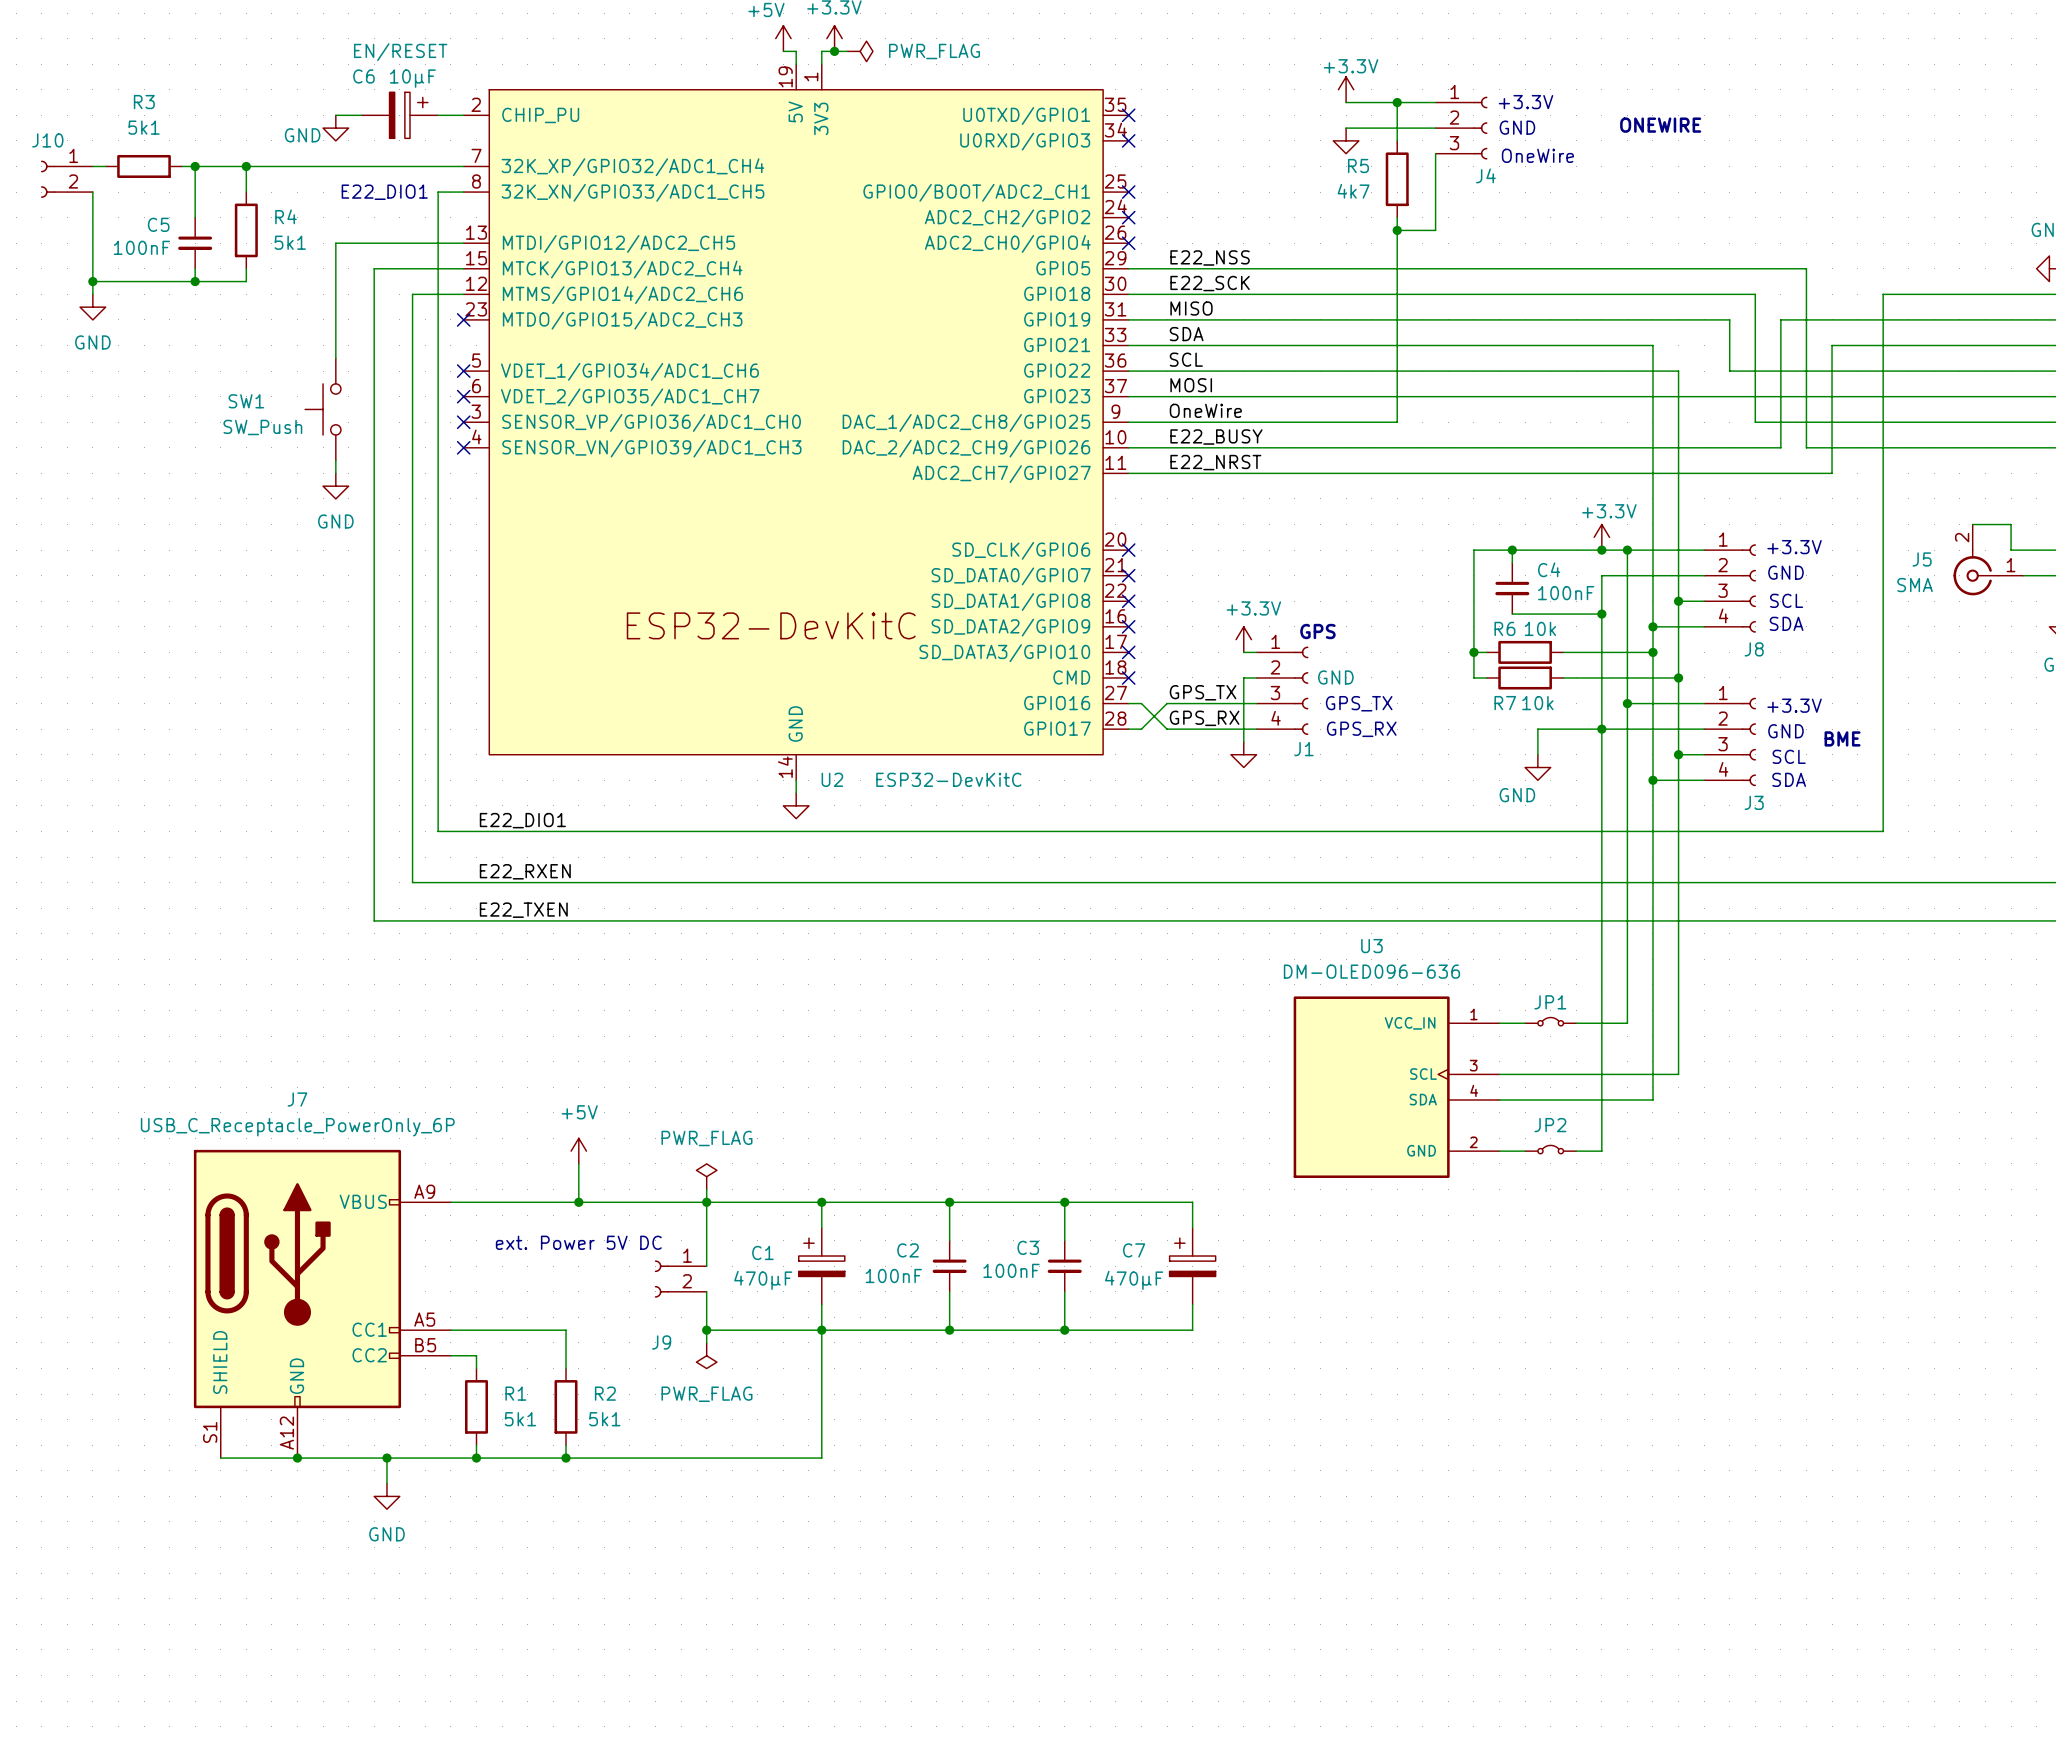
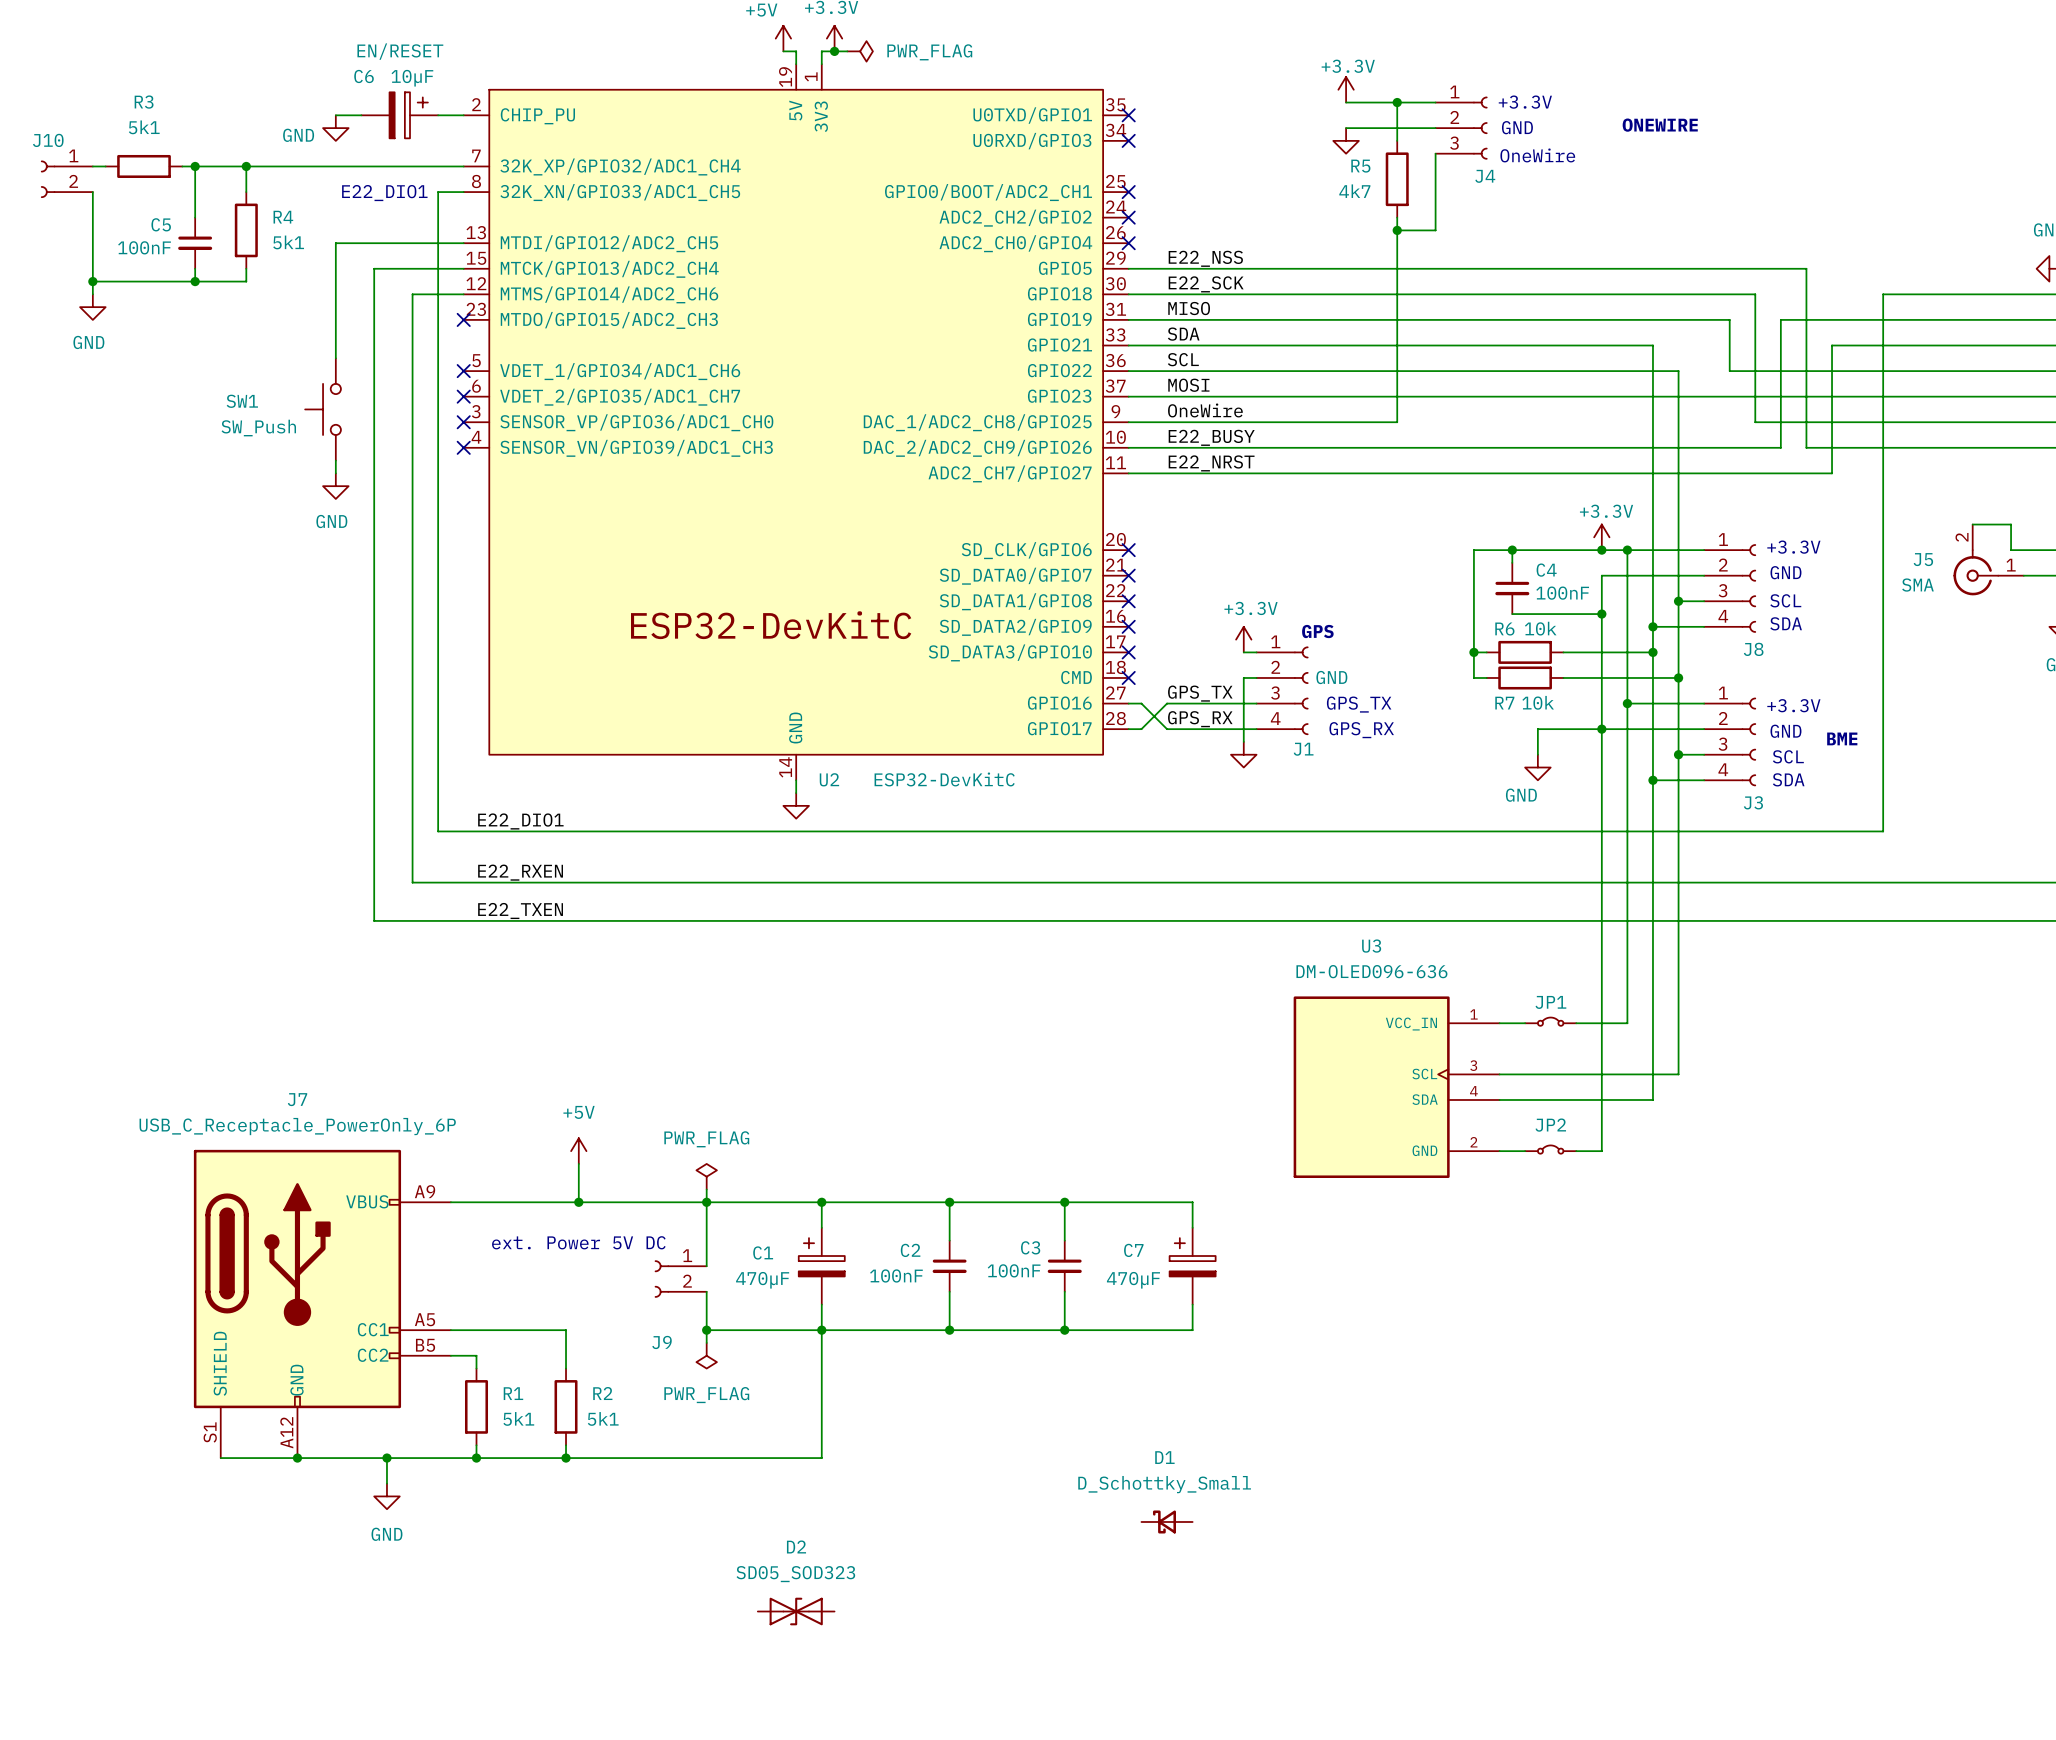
D1: none -> D_Schottky_Small (1167, 1521)
D2: none -> SD05_SOD323 (796, 1611)

